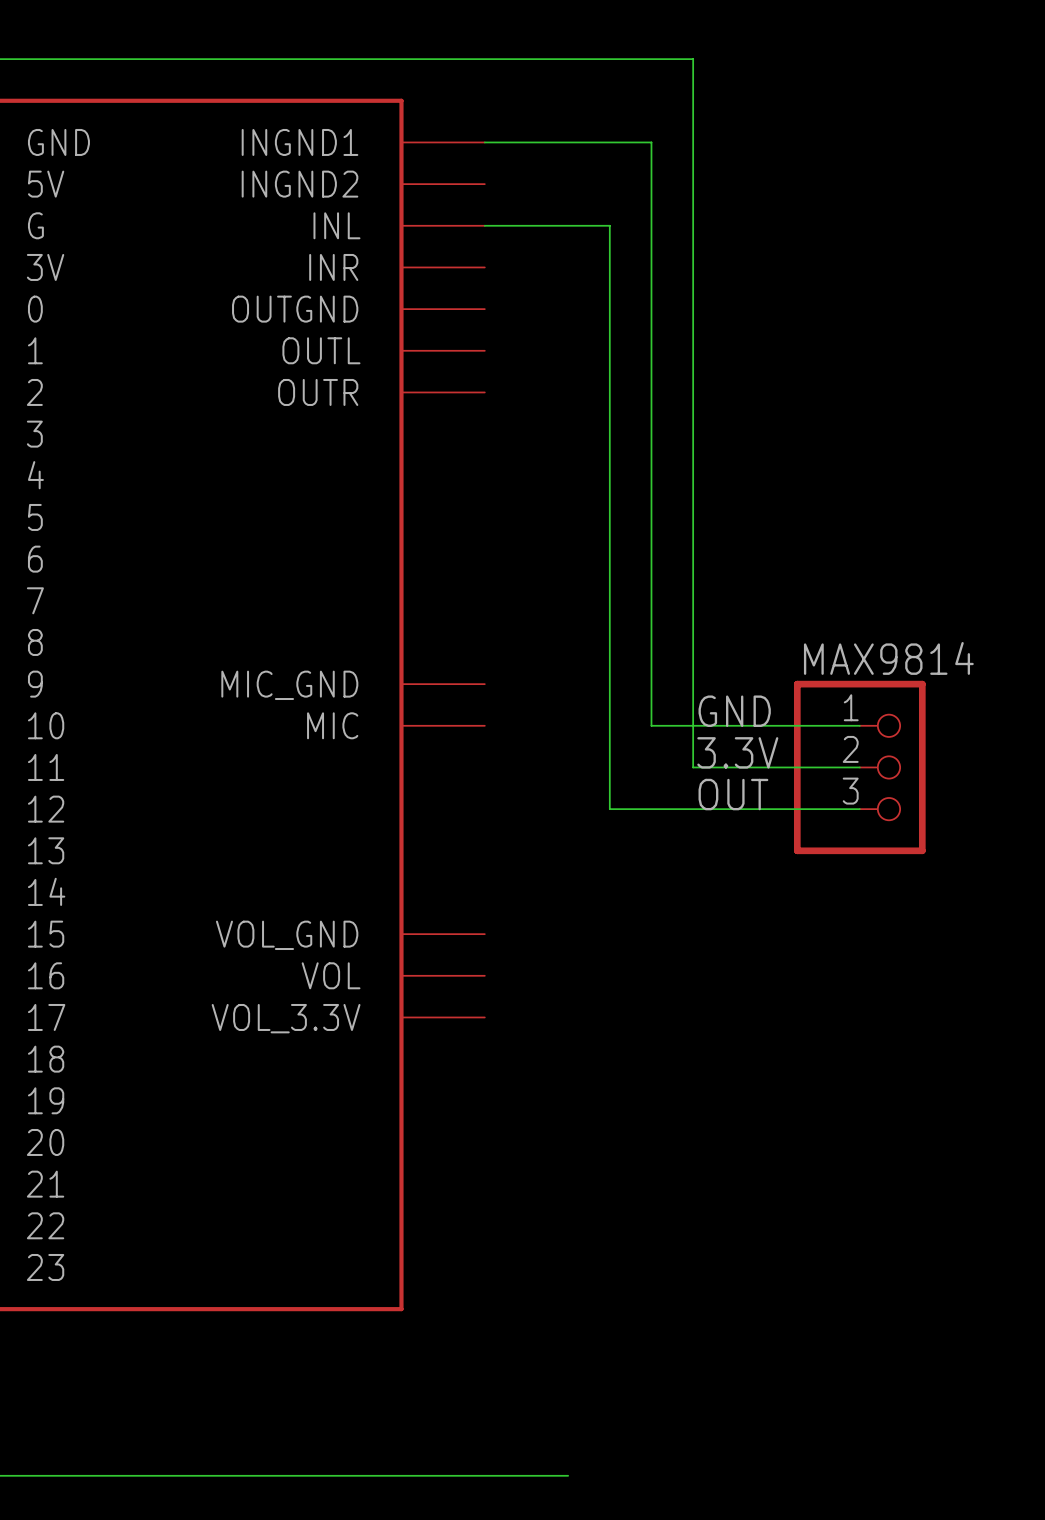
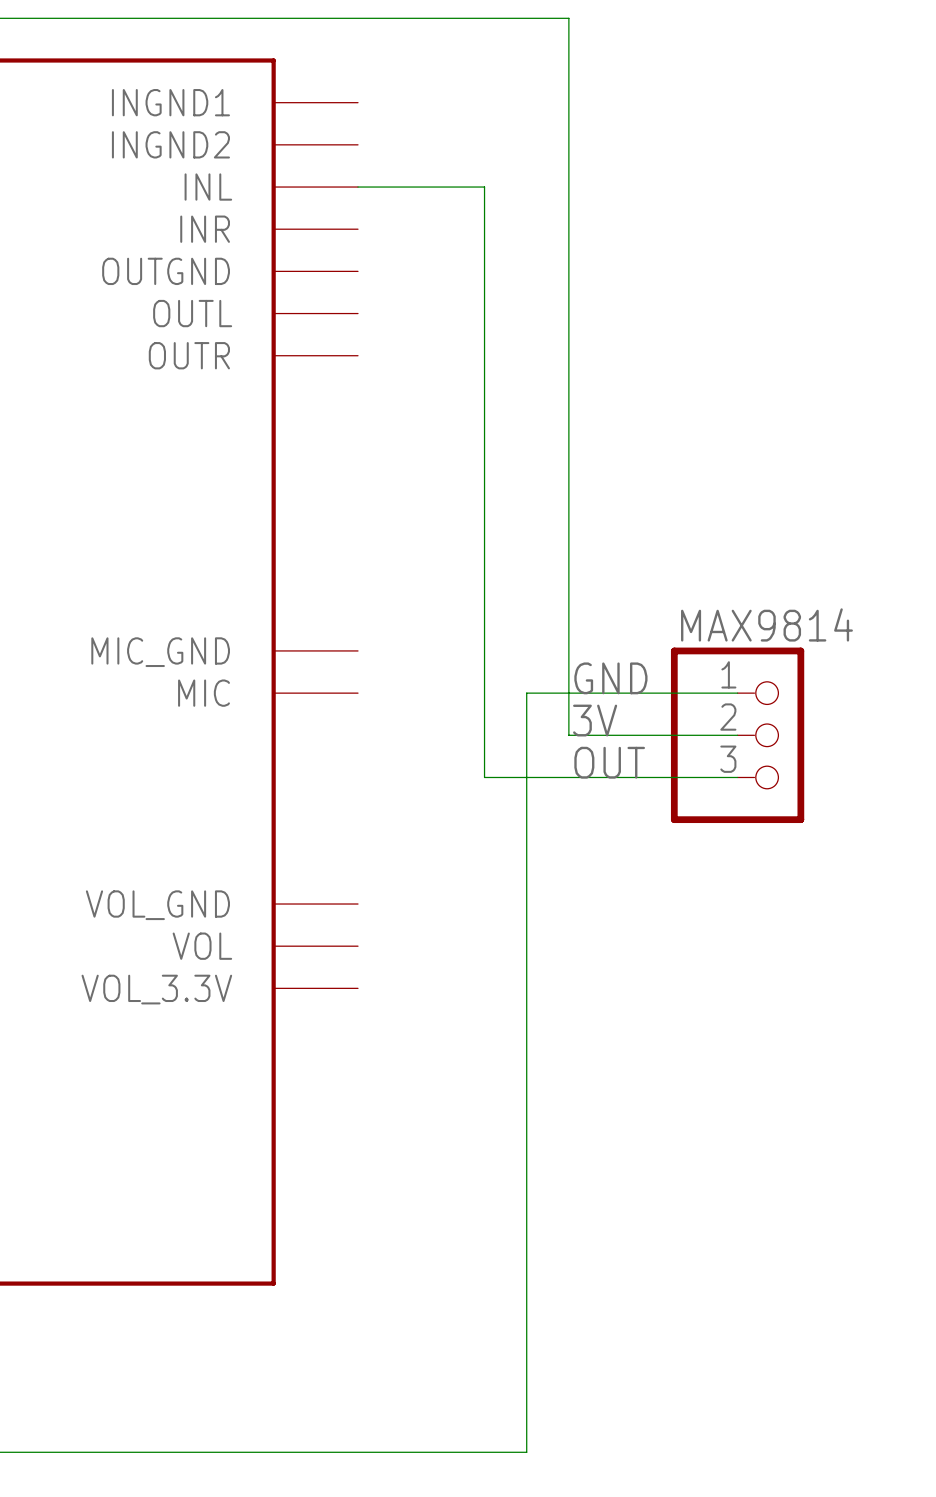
wire: (484, 142) (651, 142) (651, 725) -> (442, 1452) (526, 1452) (526, 693)
label: 3.3V (737, 752) -> 3V (595, 720)

